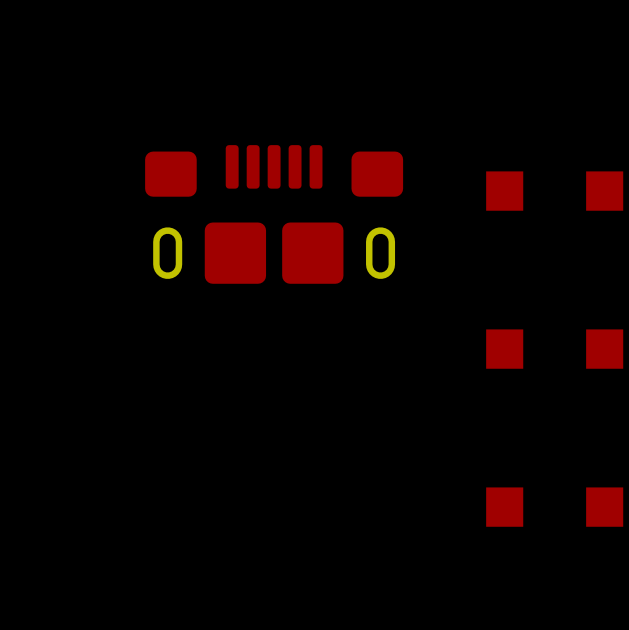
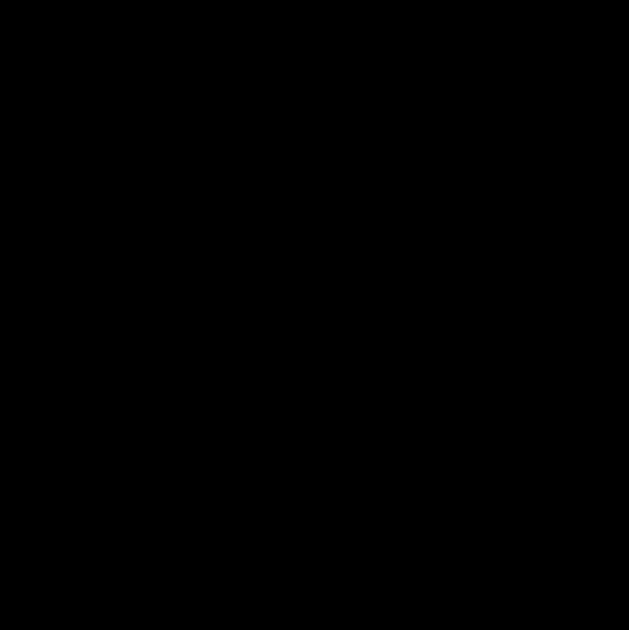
part: (554, 191) -> none
part: (274, 214) -> none
part: (554, 349) -> none
part: (554, 507) -> none

